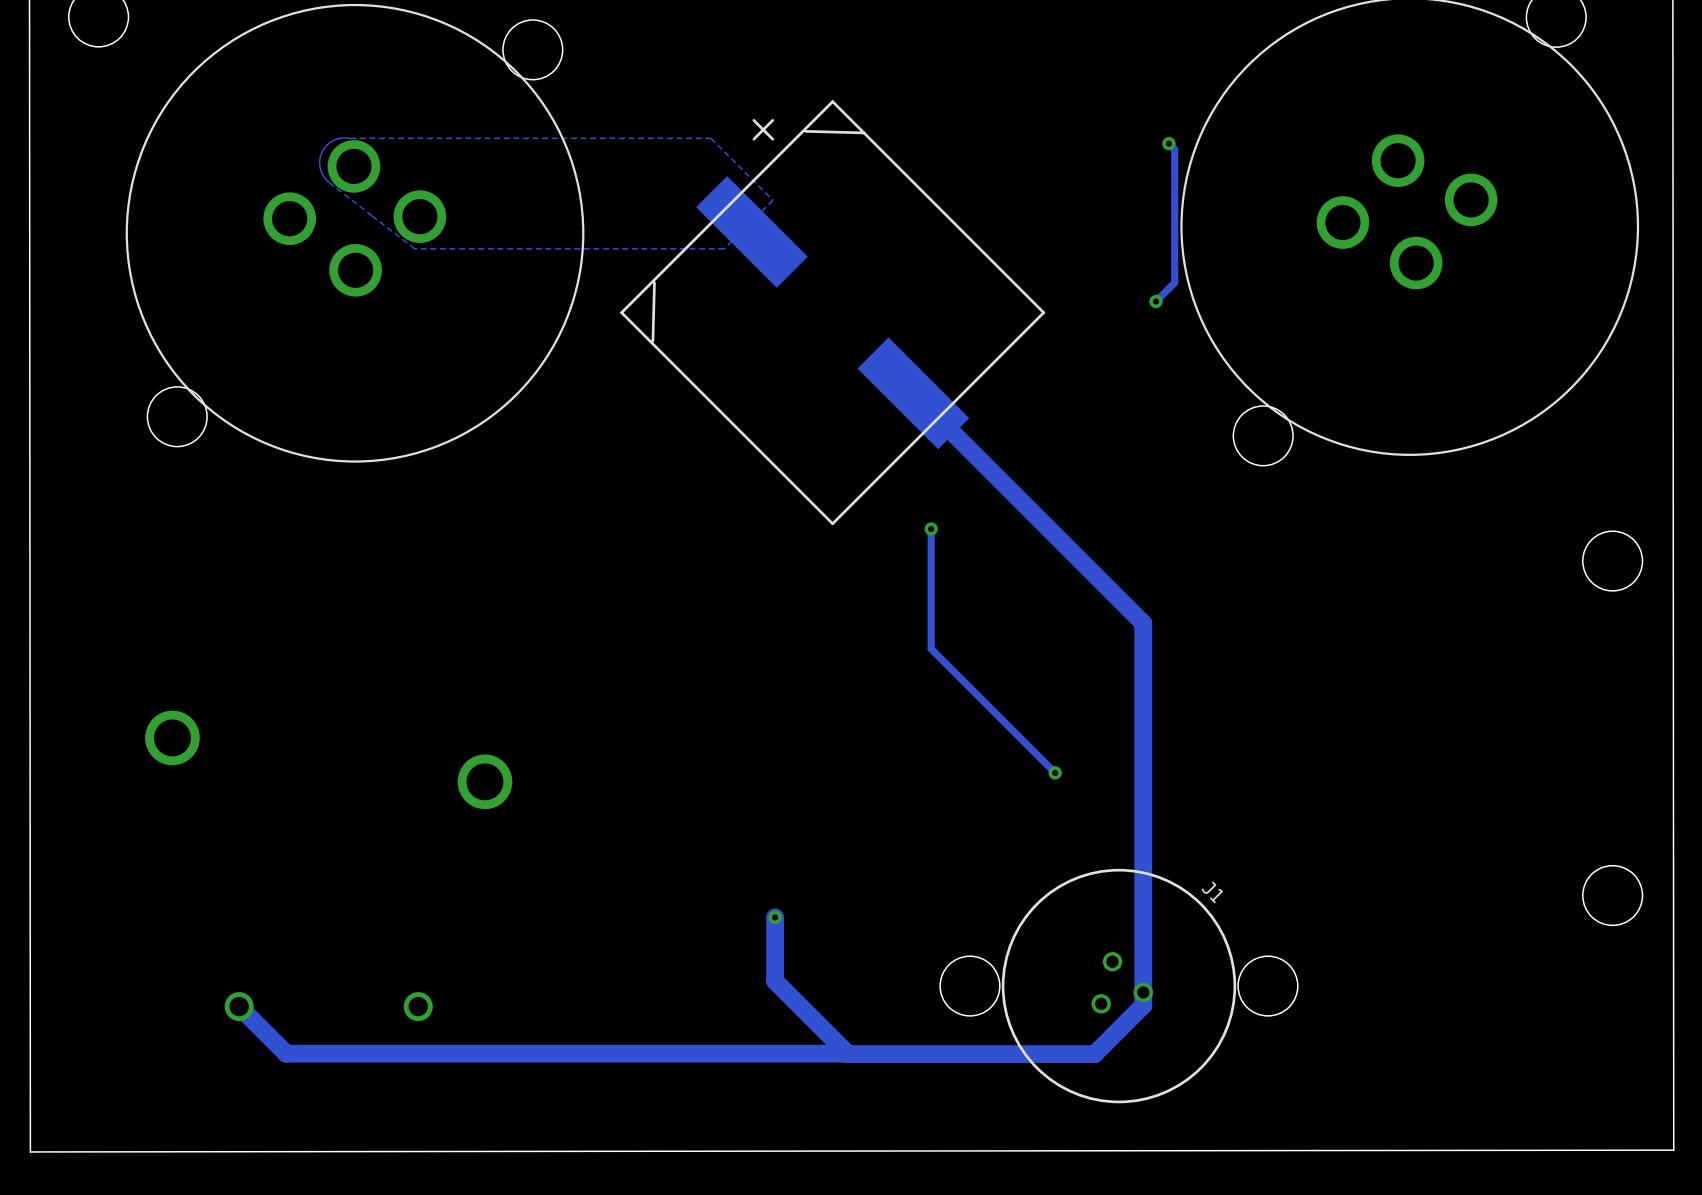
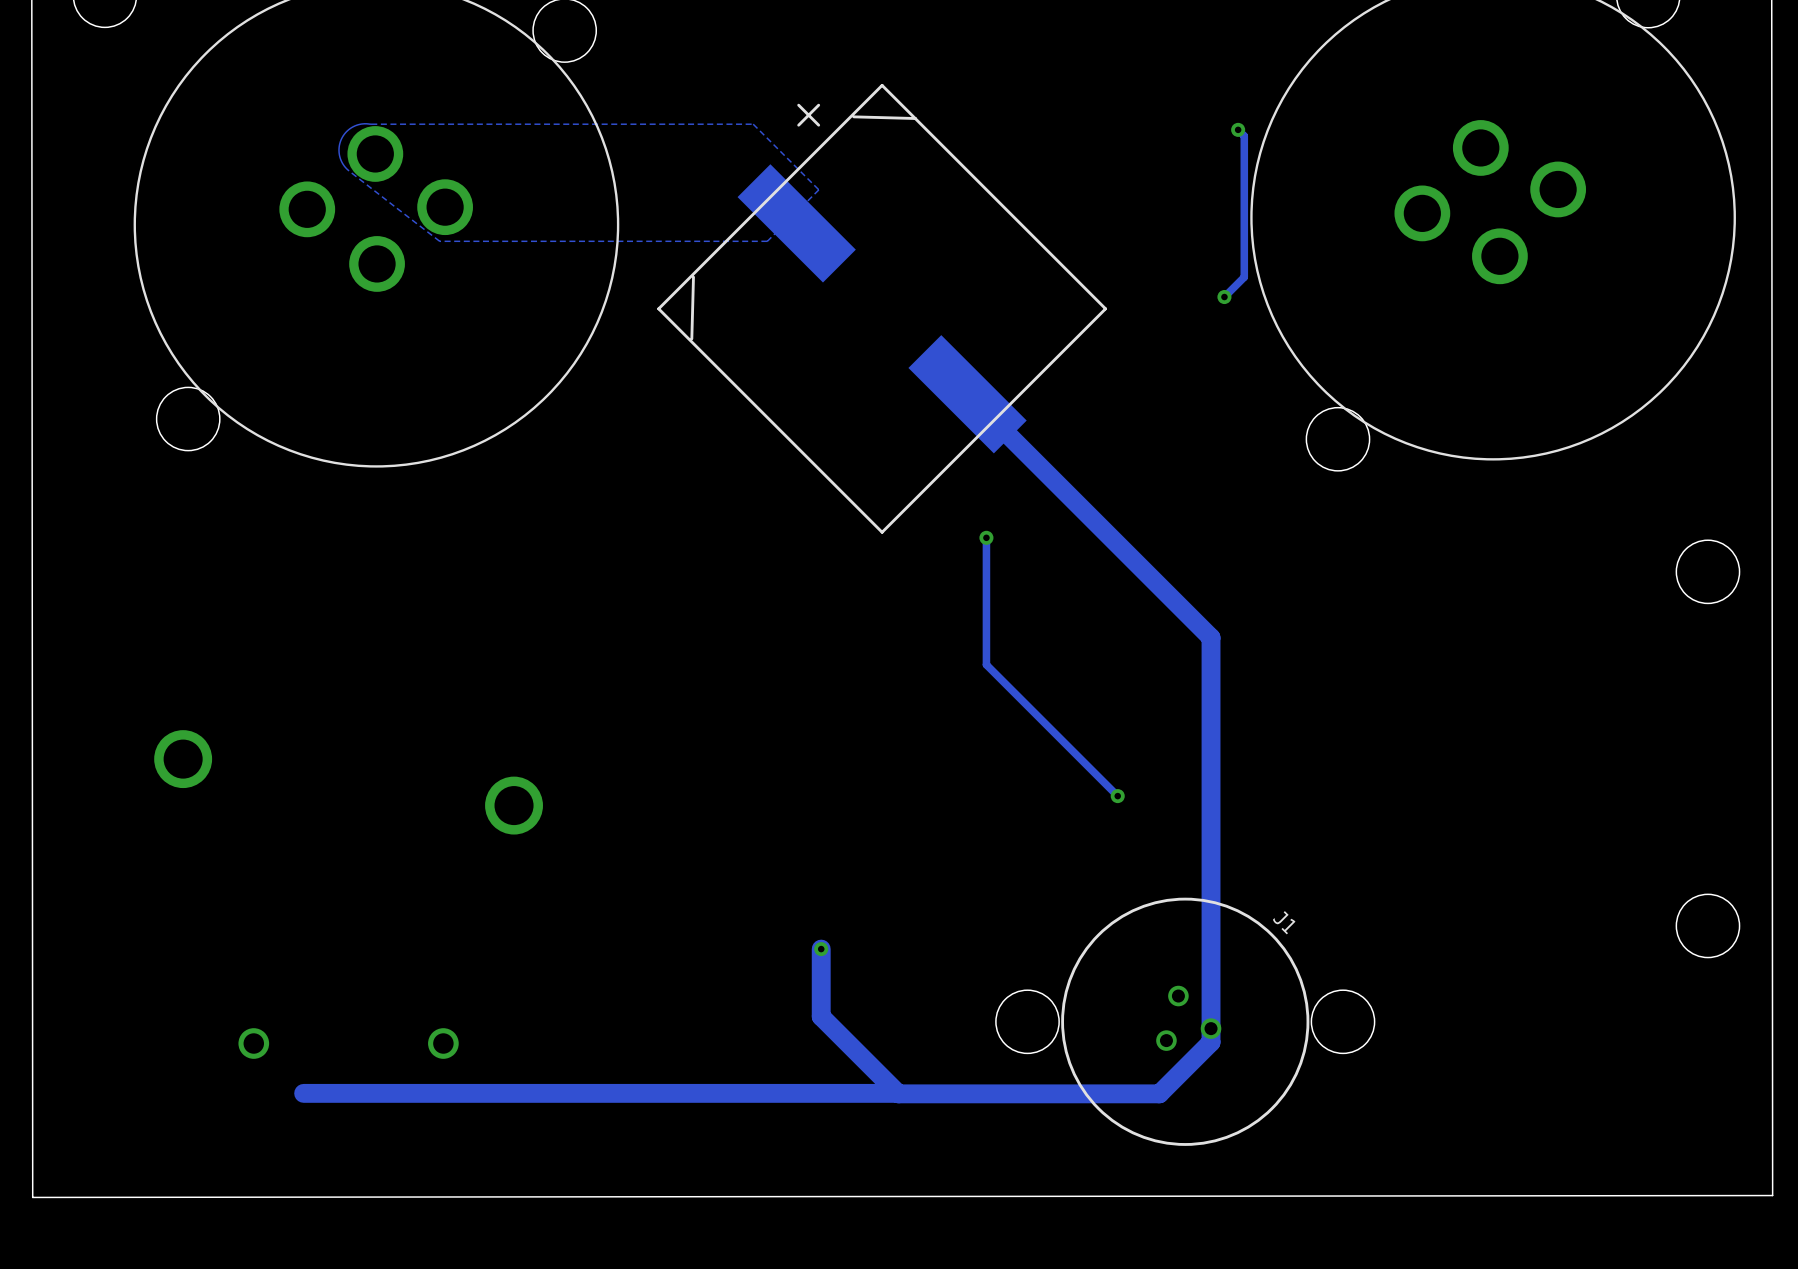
track: (239, 1006) (286, 1053) -> none

